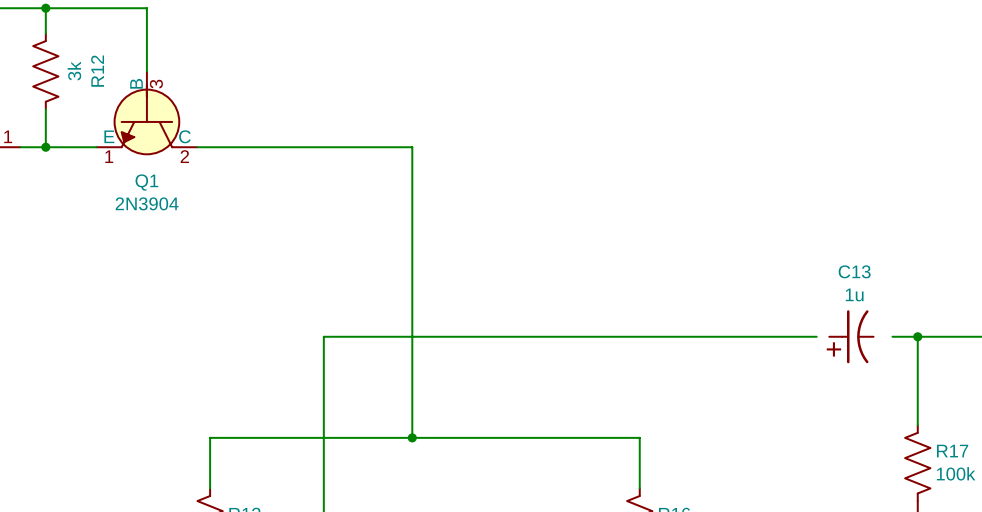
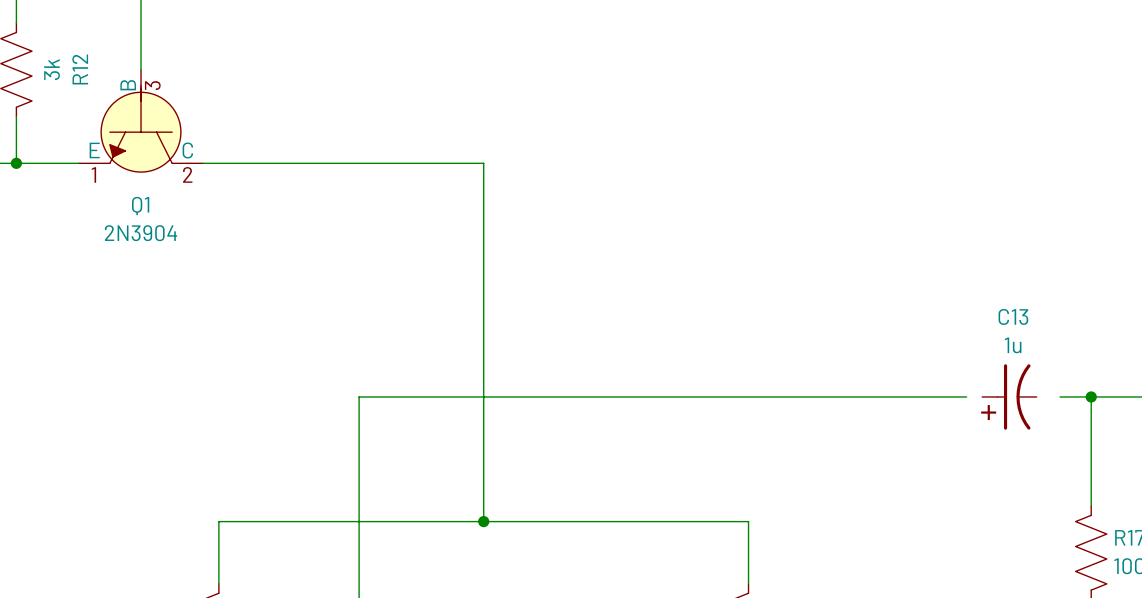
wire: (412, 147) (412, 437) -> (468, 163) (483, 163) (483, 521)
junction position: (412, 437) -> (483, 521)

